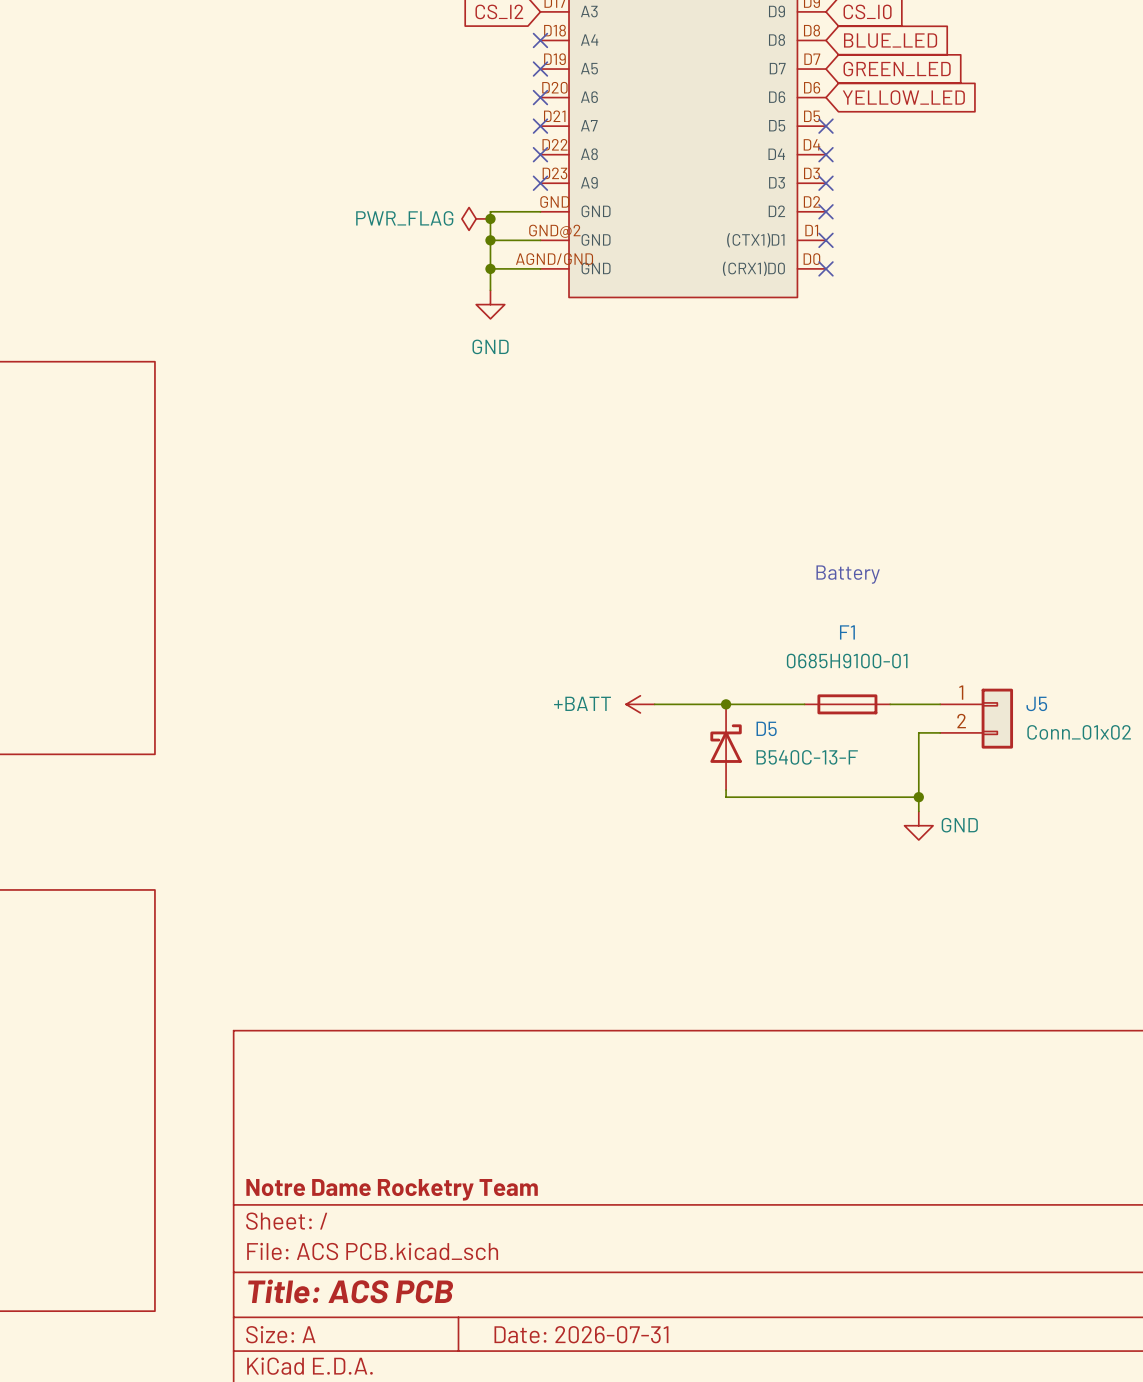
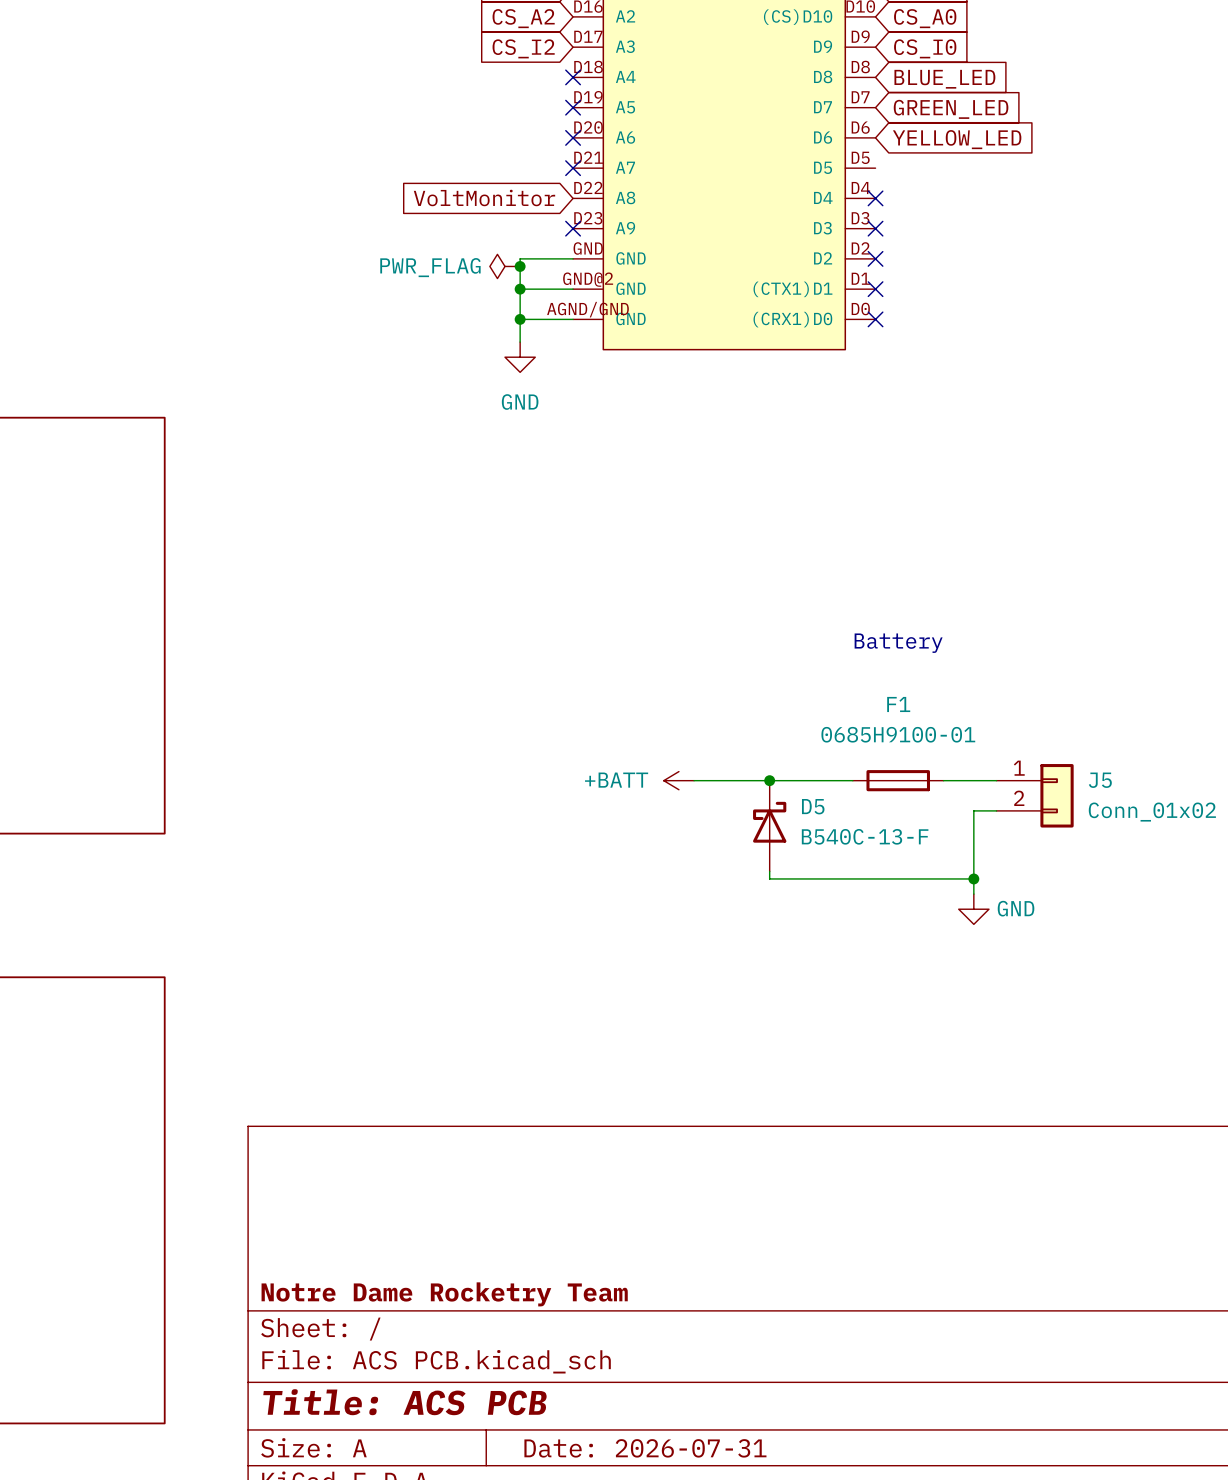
no-connect mark: (825, 126) -> none
global label: none -> VoltMonitor (484, 197)
no-connect mark: (540, 154) -> none

